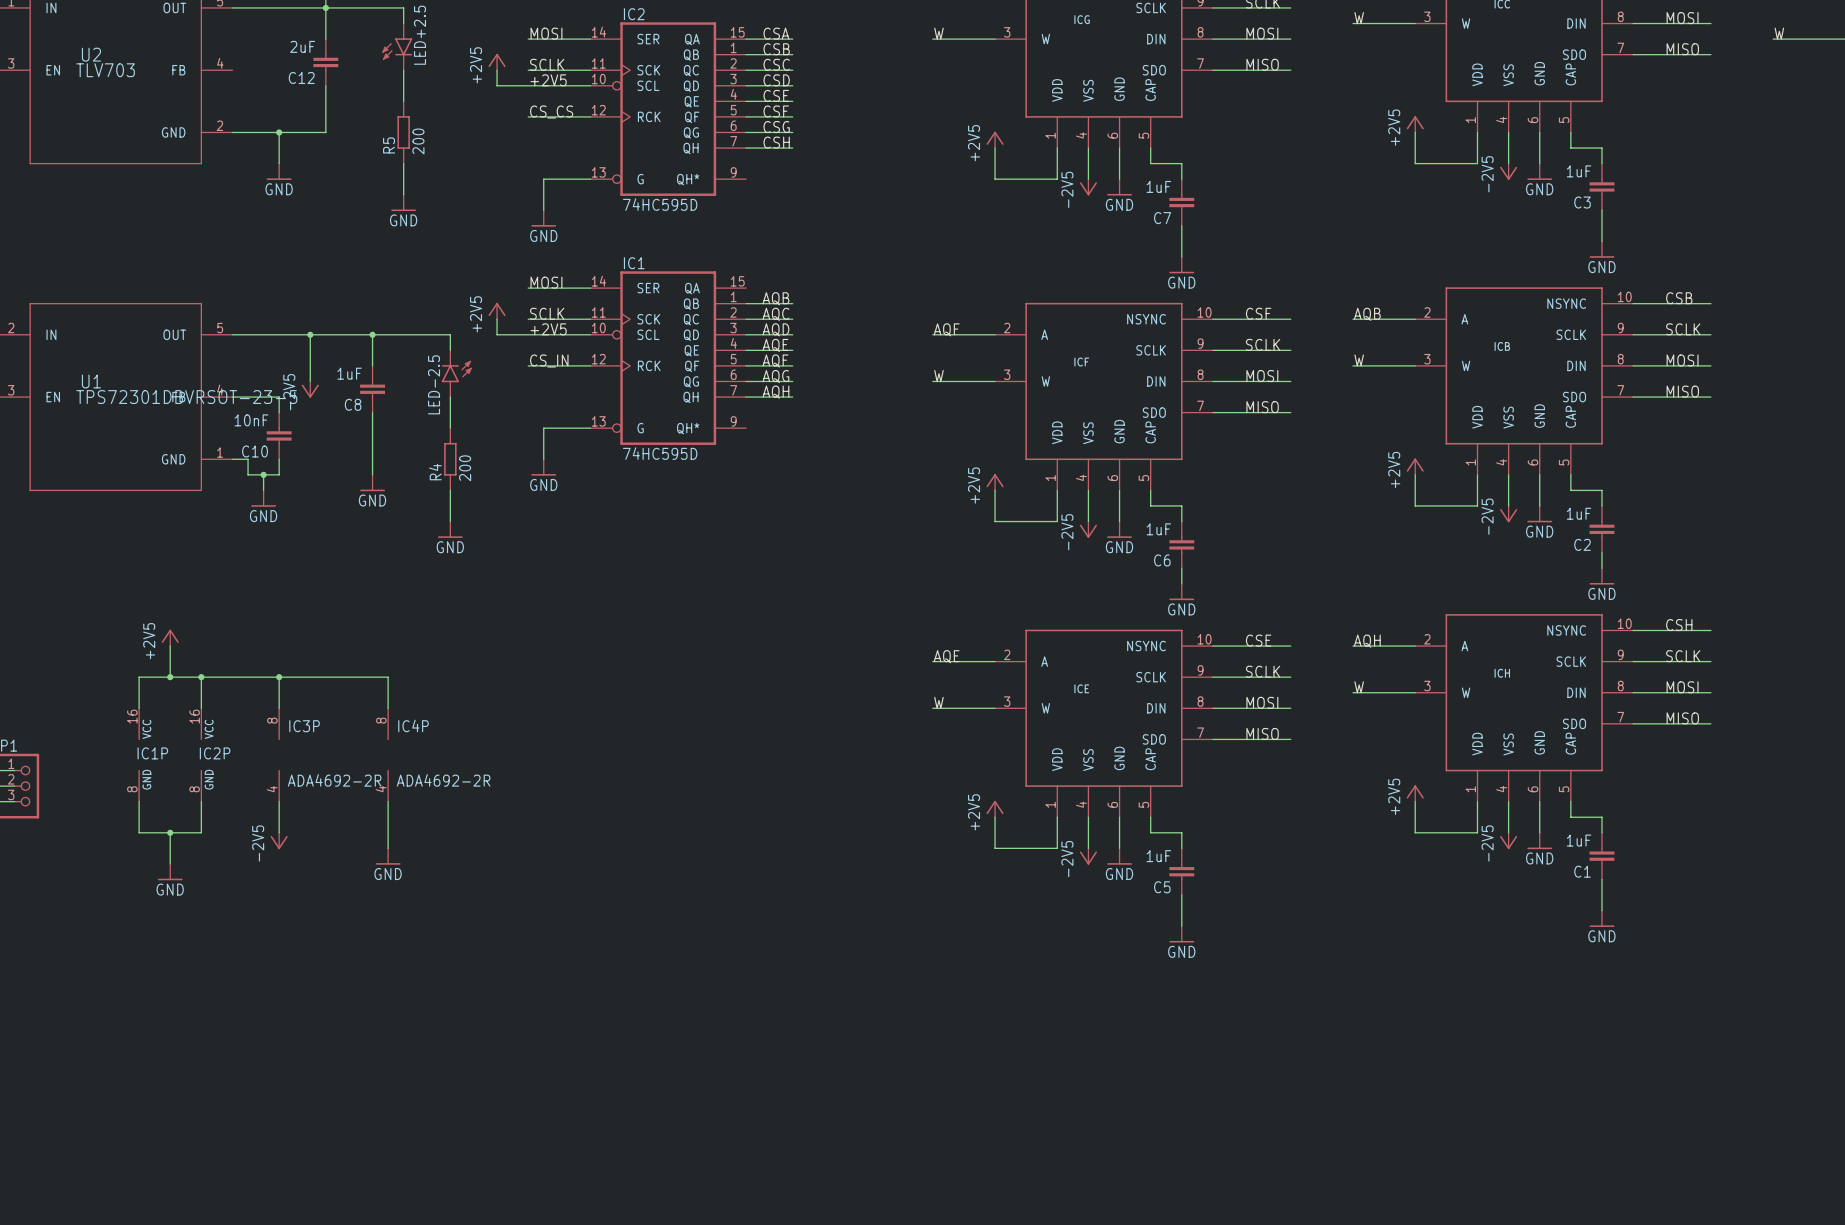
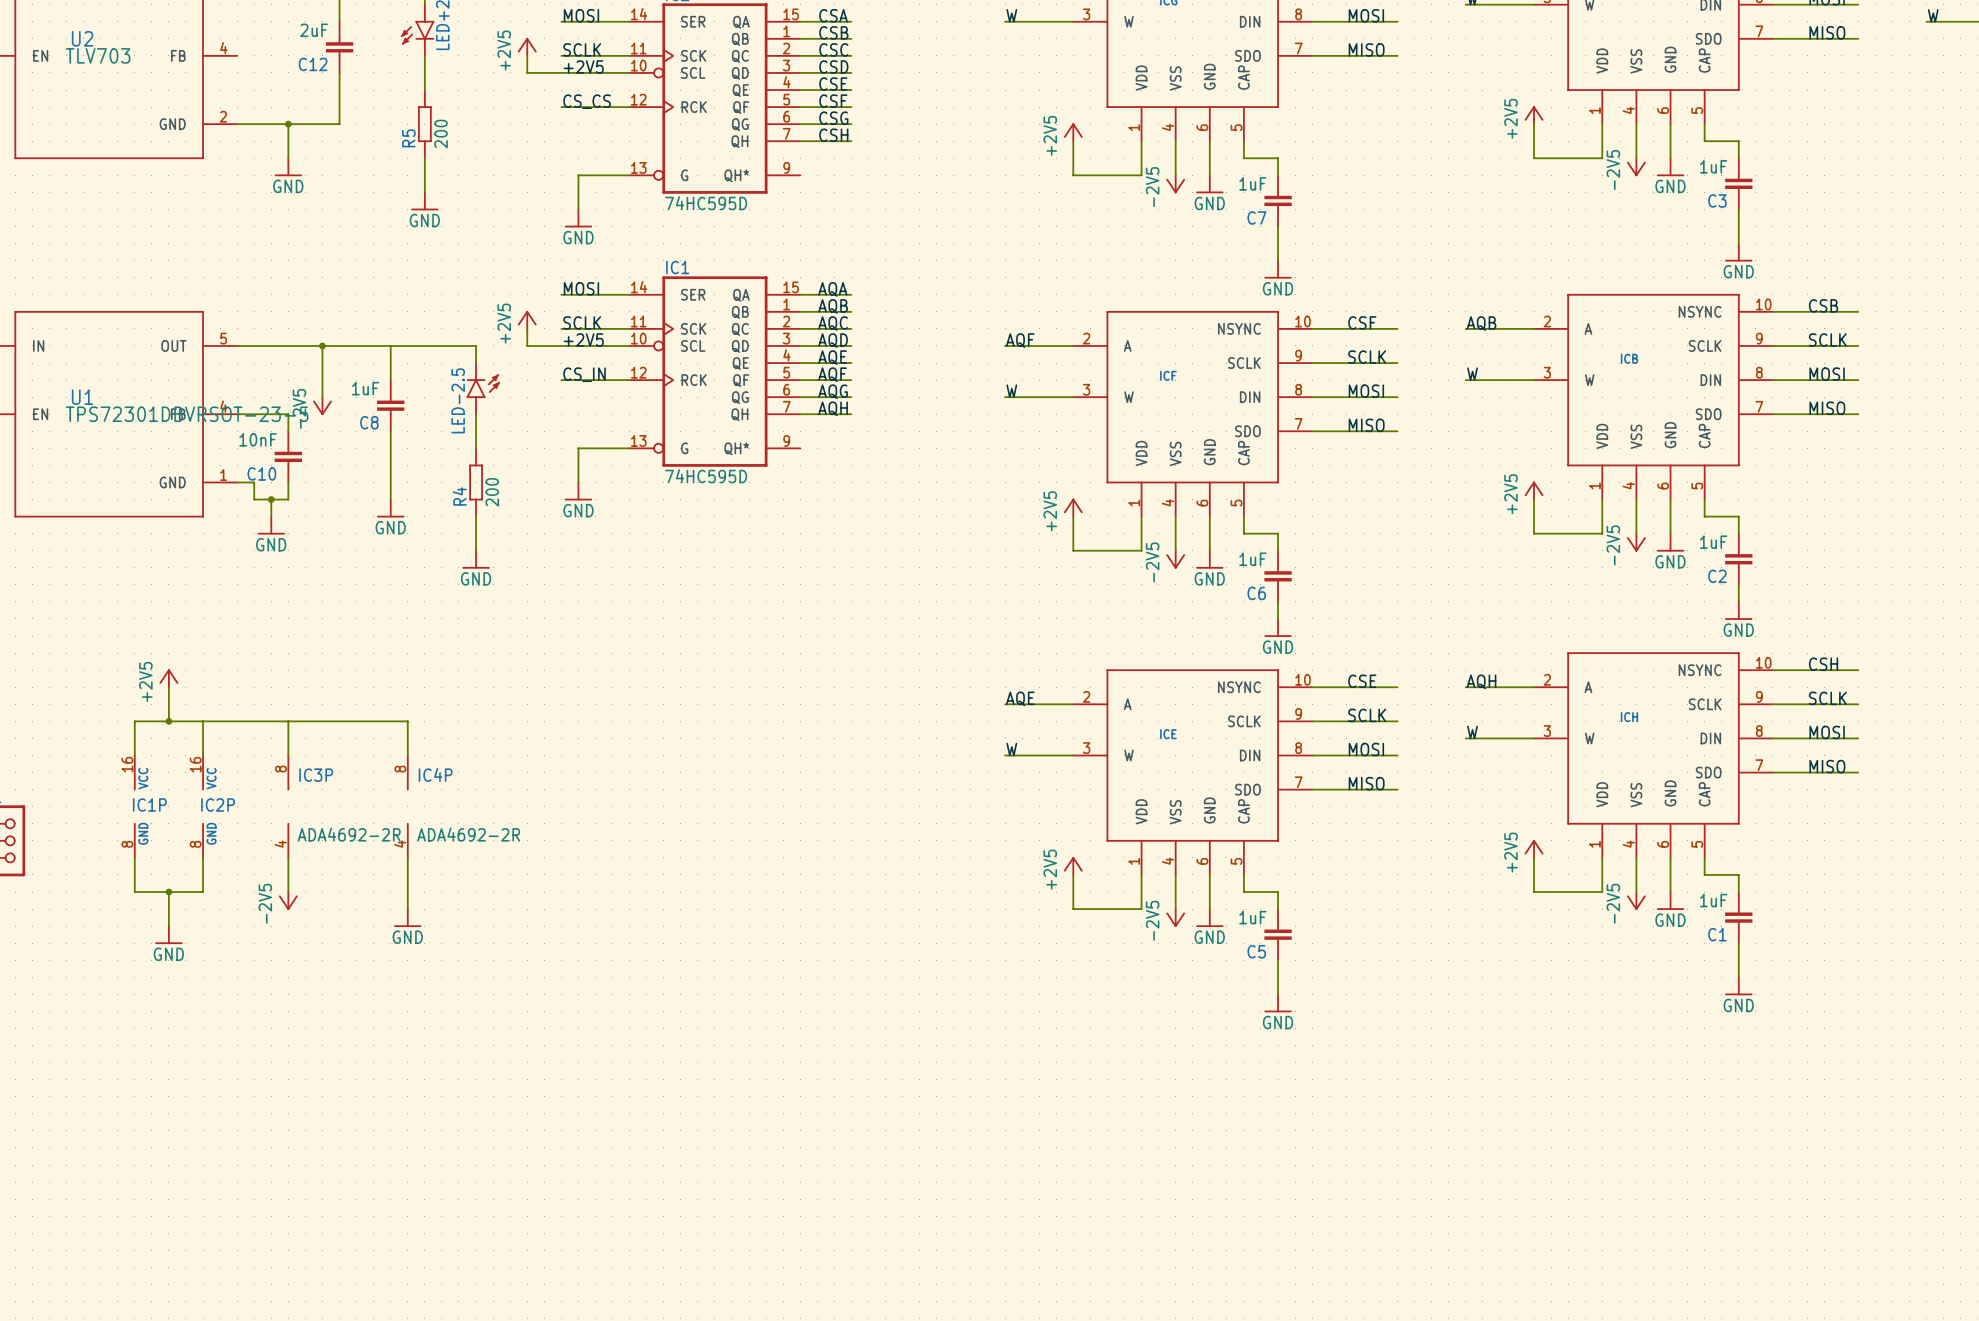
label: none -> AQA (832, 289)
wire: none -> (800, 294) (851, 294)
junction: (372, 334) -> none
junction: (201, 677) -> none
junction: (279, 677) -> none

